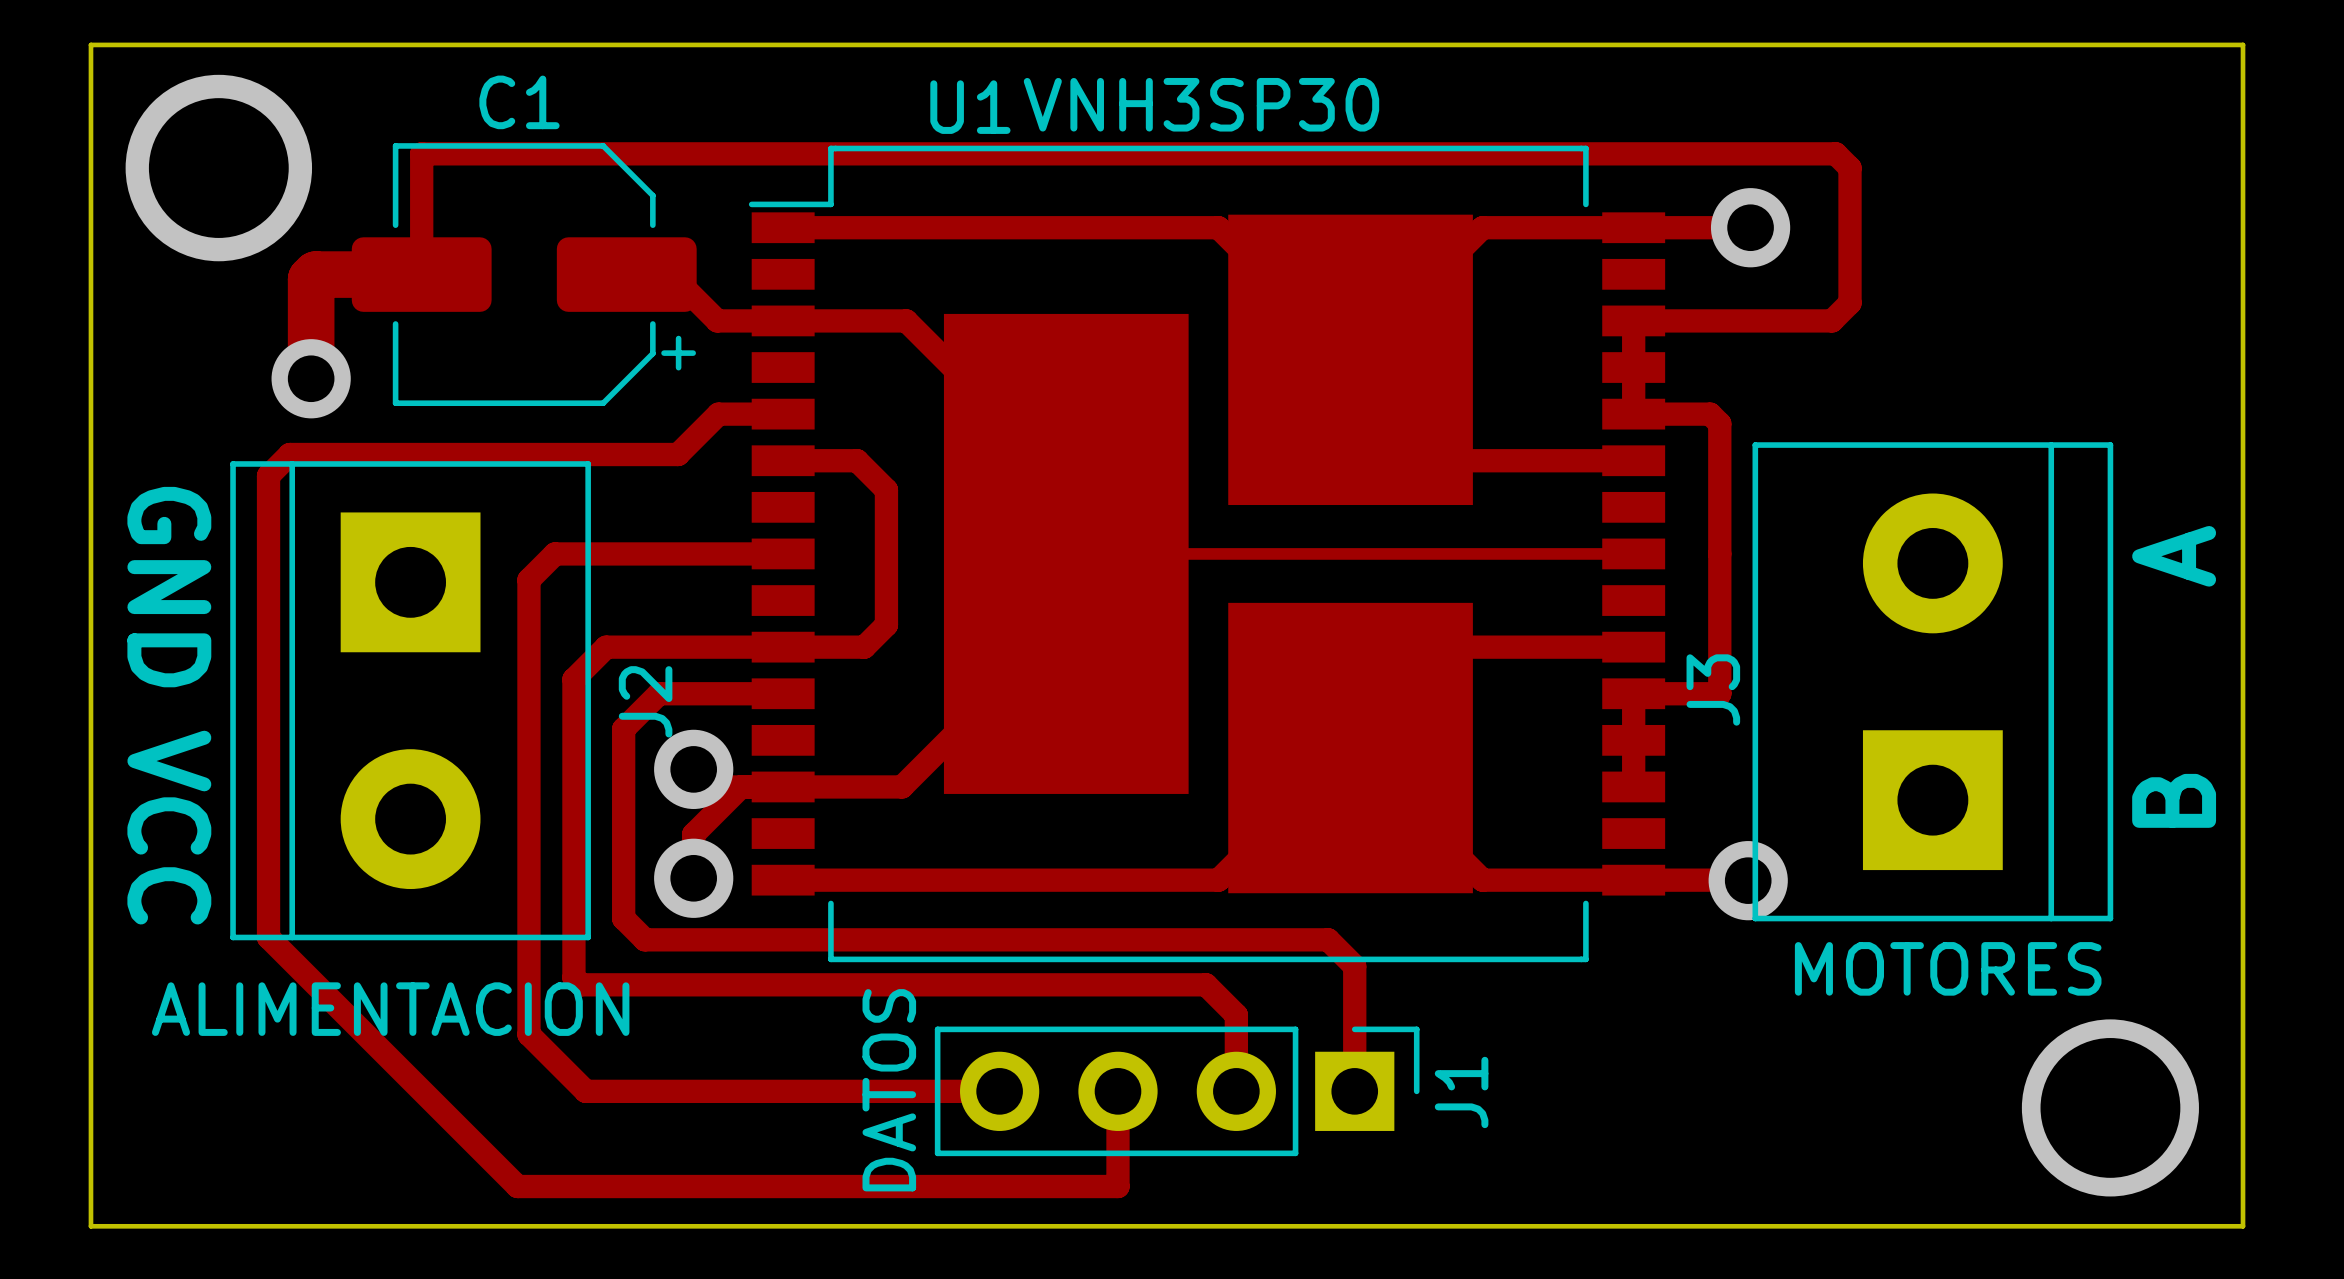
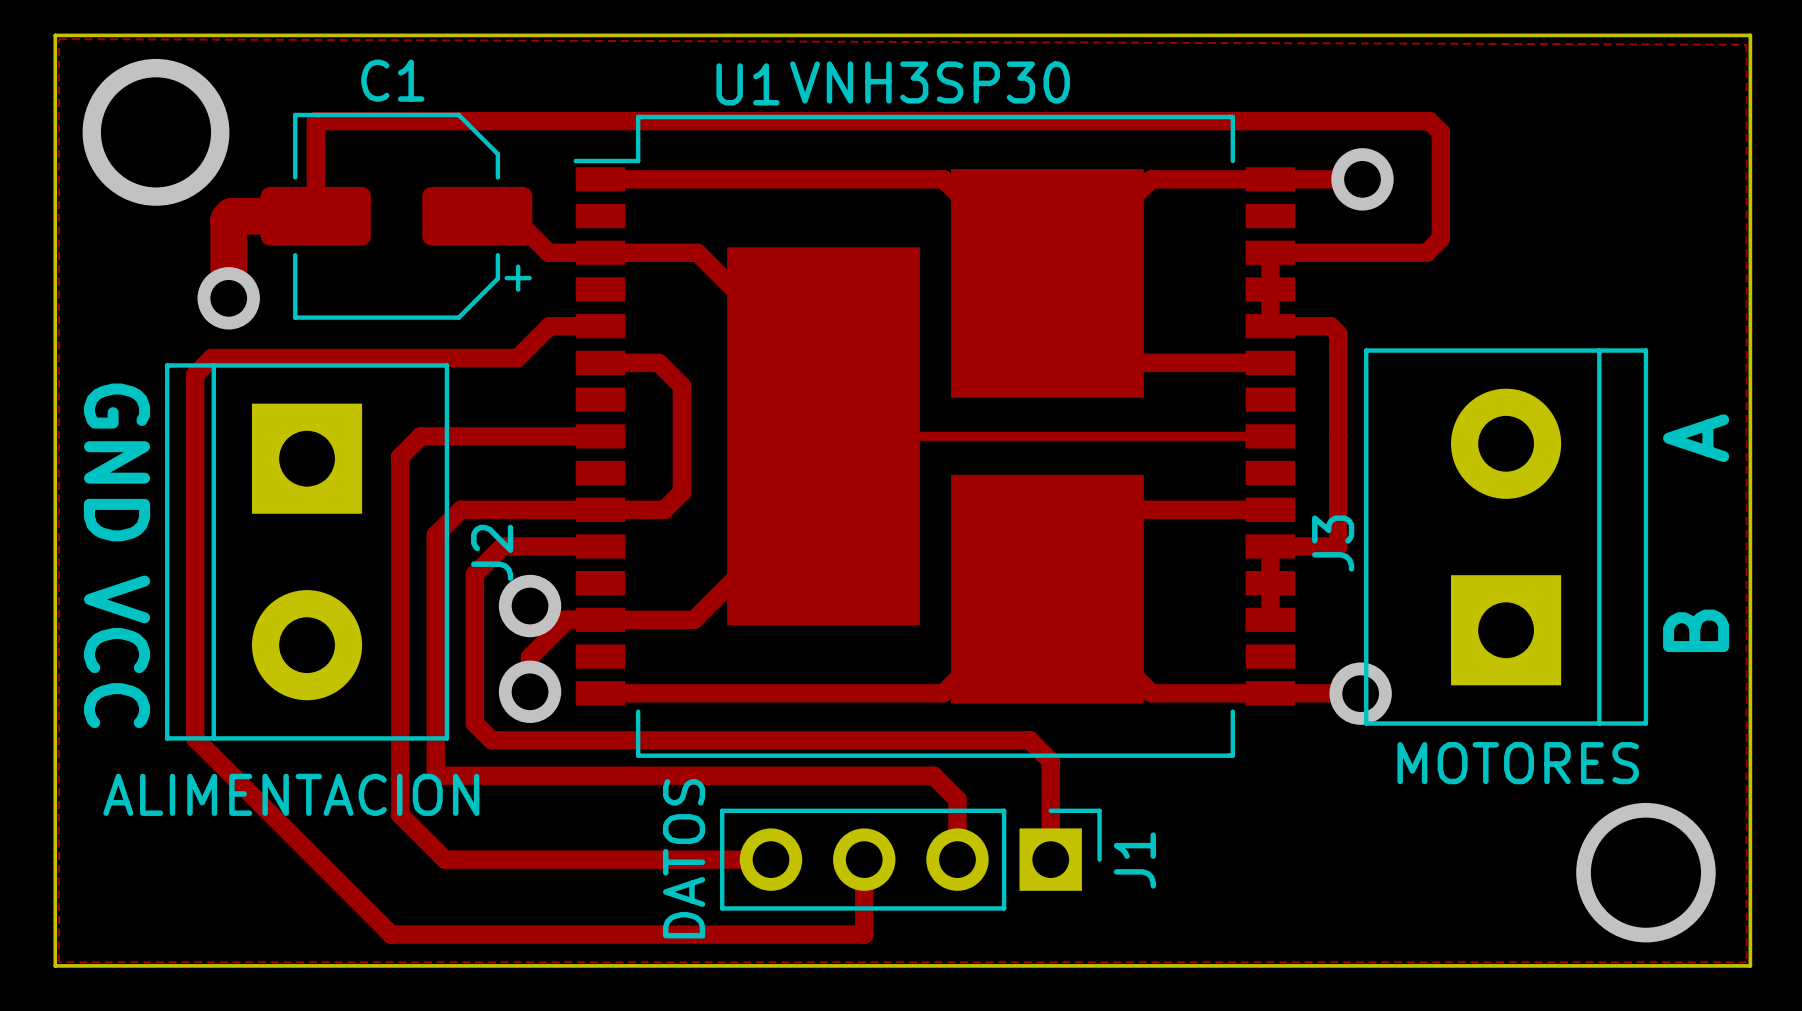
zone outline: none -> (59, 39) (59, 962) (1746, 962) (1746, 44) (59, 39)

